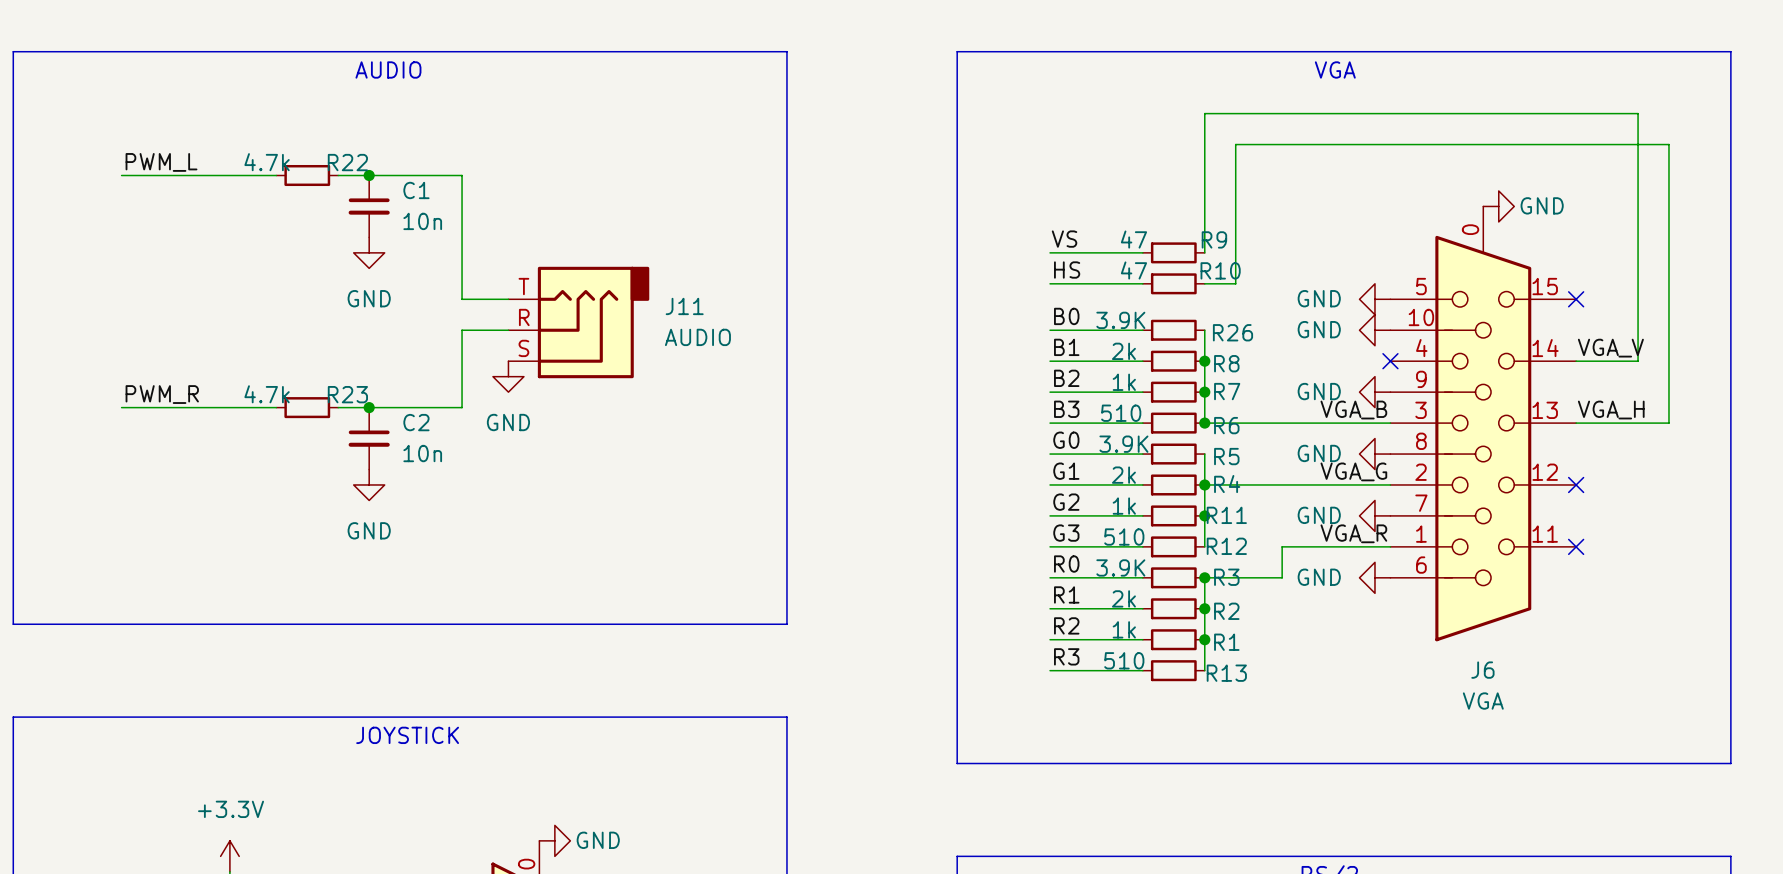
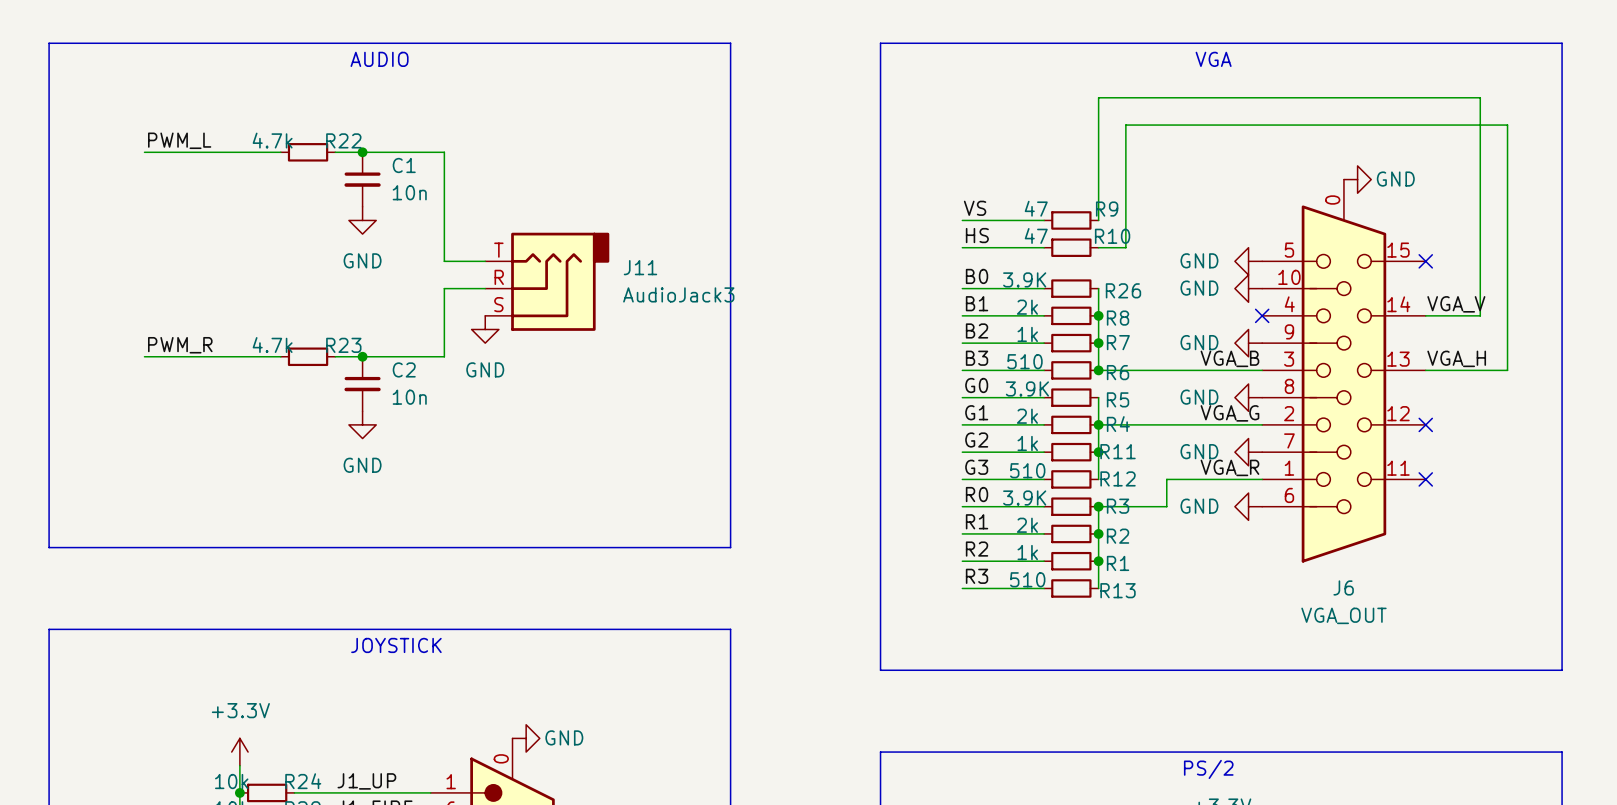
J11 value: AUDIO (697, 337) -> AudioJack3 (678, 294)
J6 value: VGA (1483, 701) -> VGA_OUT (1343, 615)

